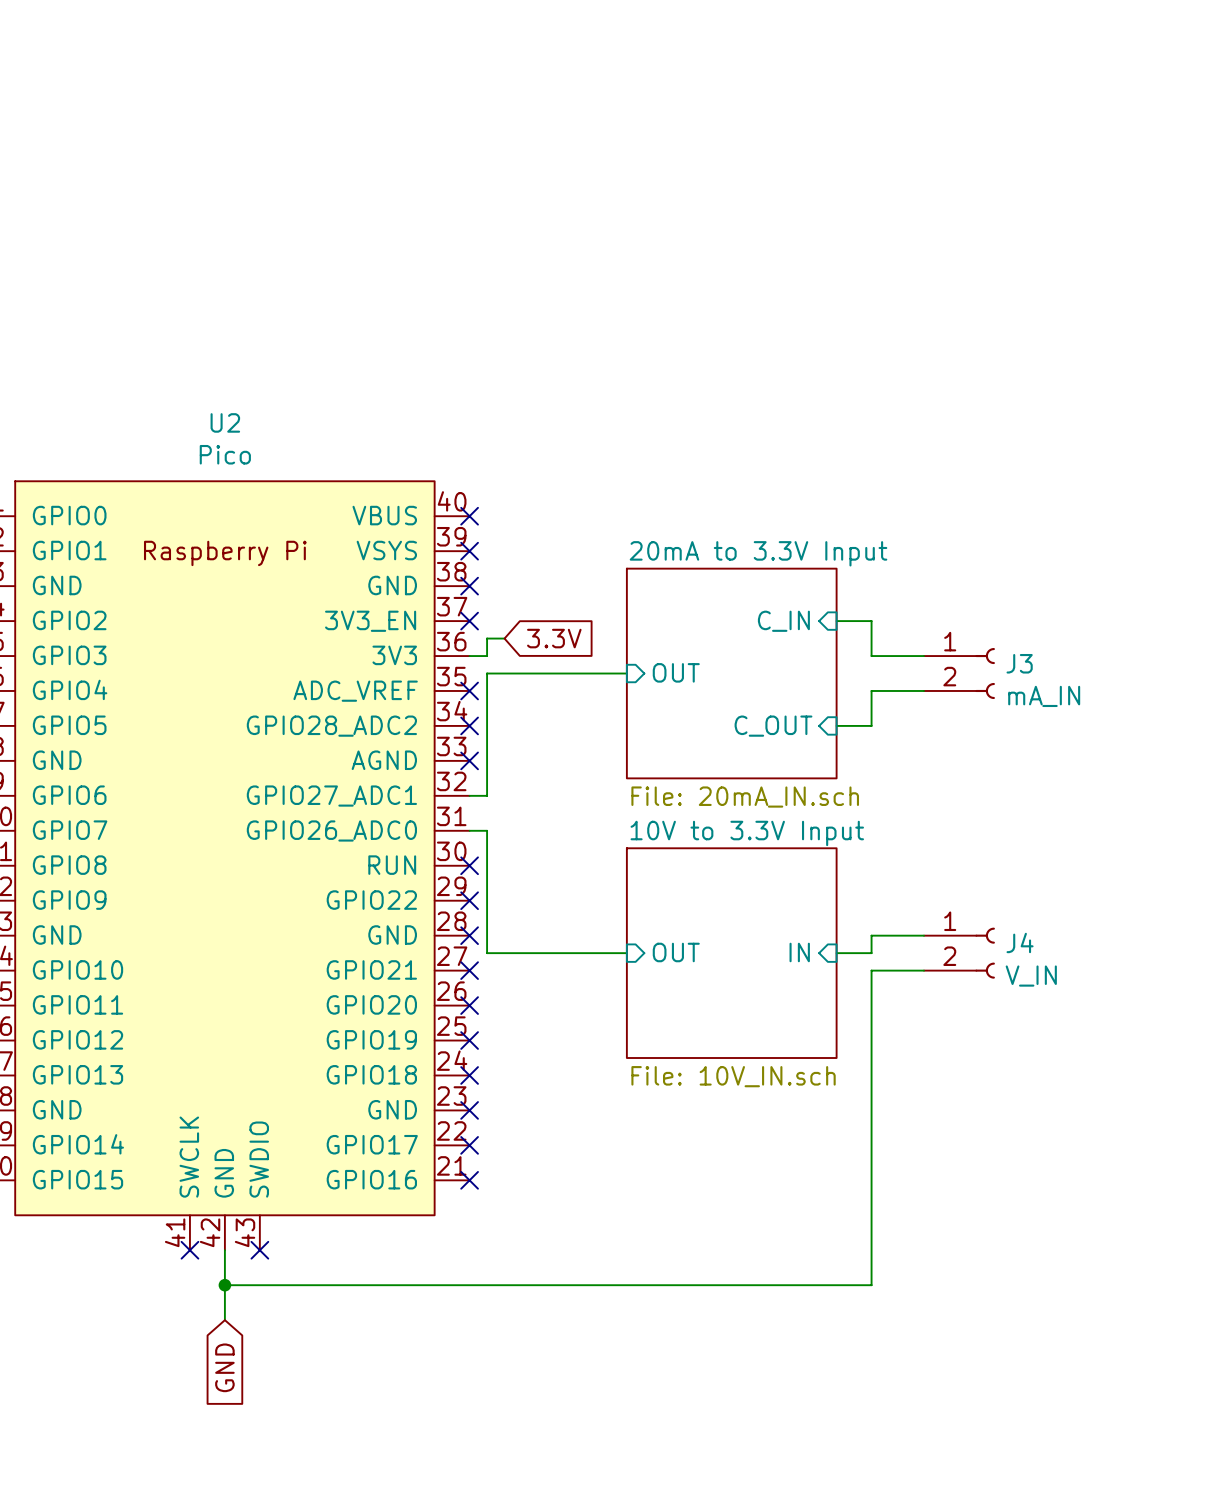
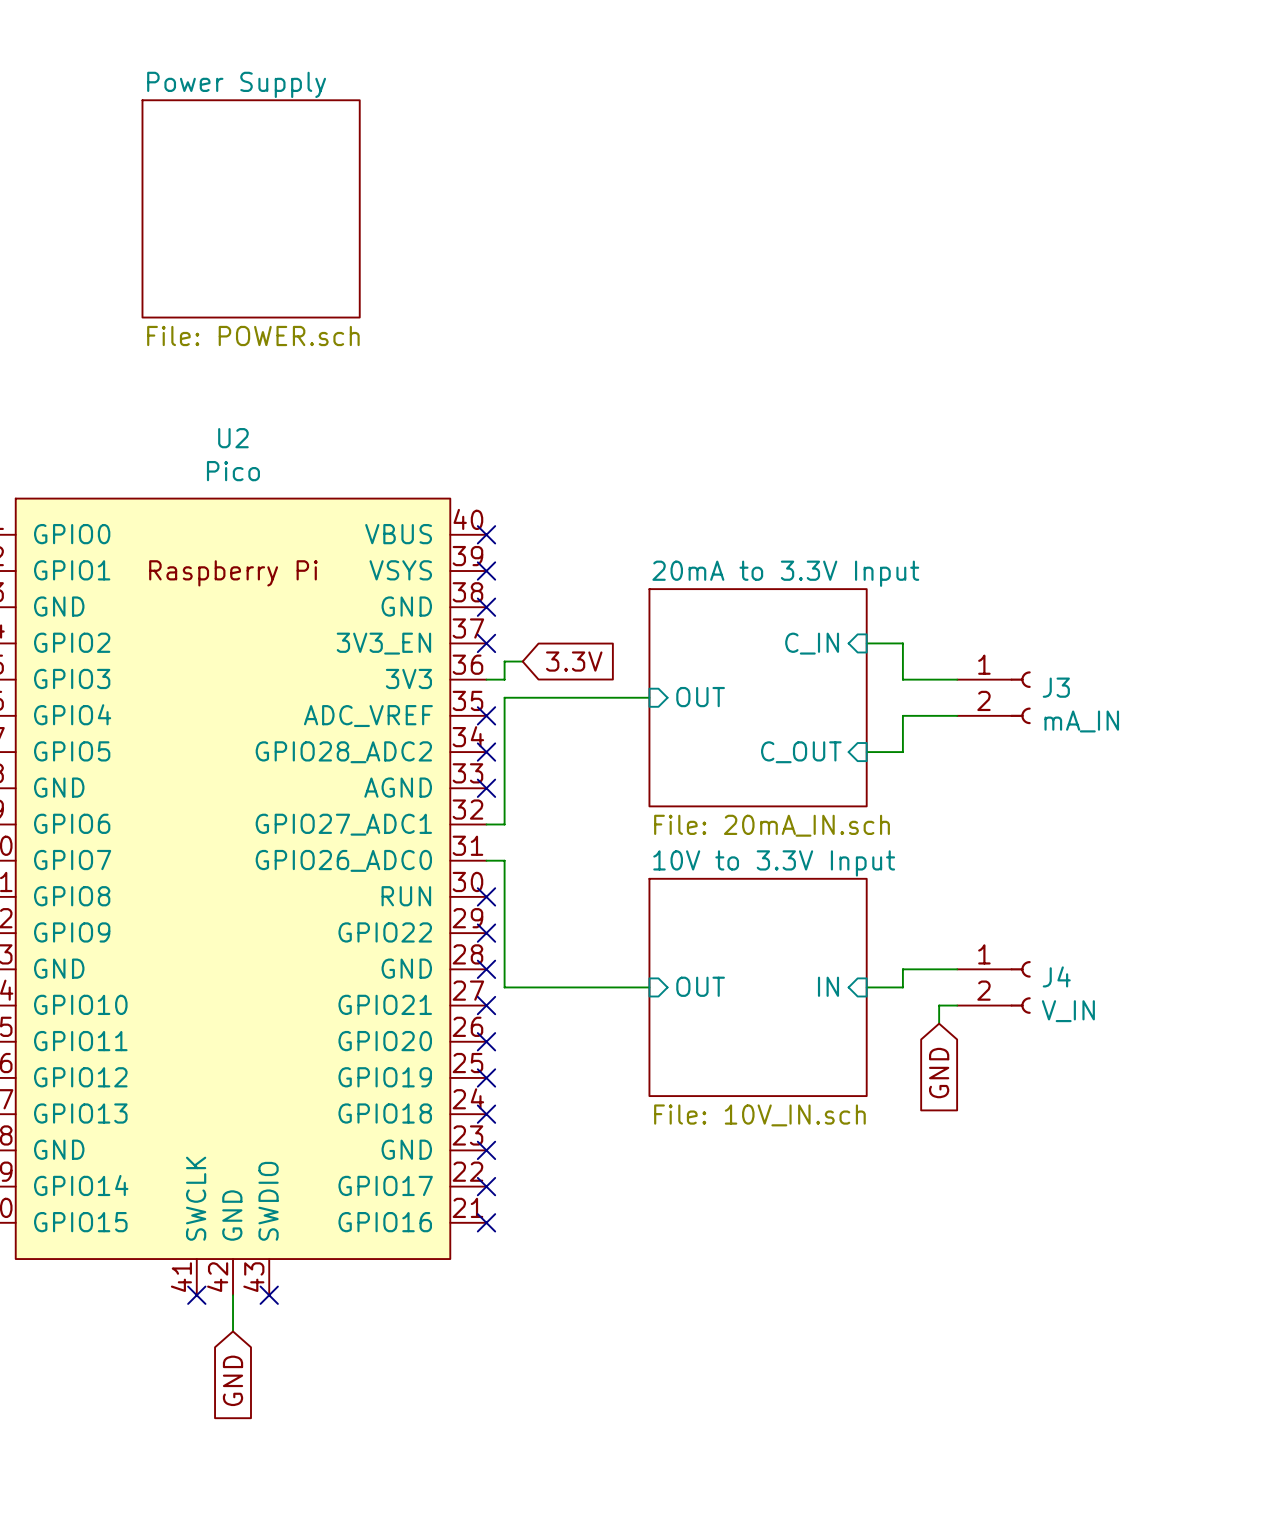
sheet Power Supply: none -> File: POWER.sch (251, 208)
wire: (906, 970) (871, 970) (871, 1285) (224, 1285) (224, 1320) -> (939, 1005) (939, 1023)
global label: none -> GND (939, 1073)
junction: (224, 1285) -> none
global label position: GND (224, 1367) -> GND (233, 1380)

